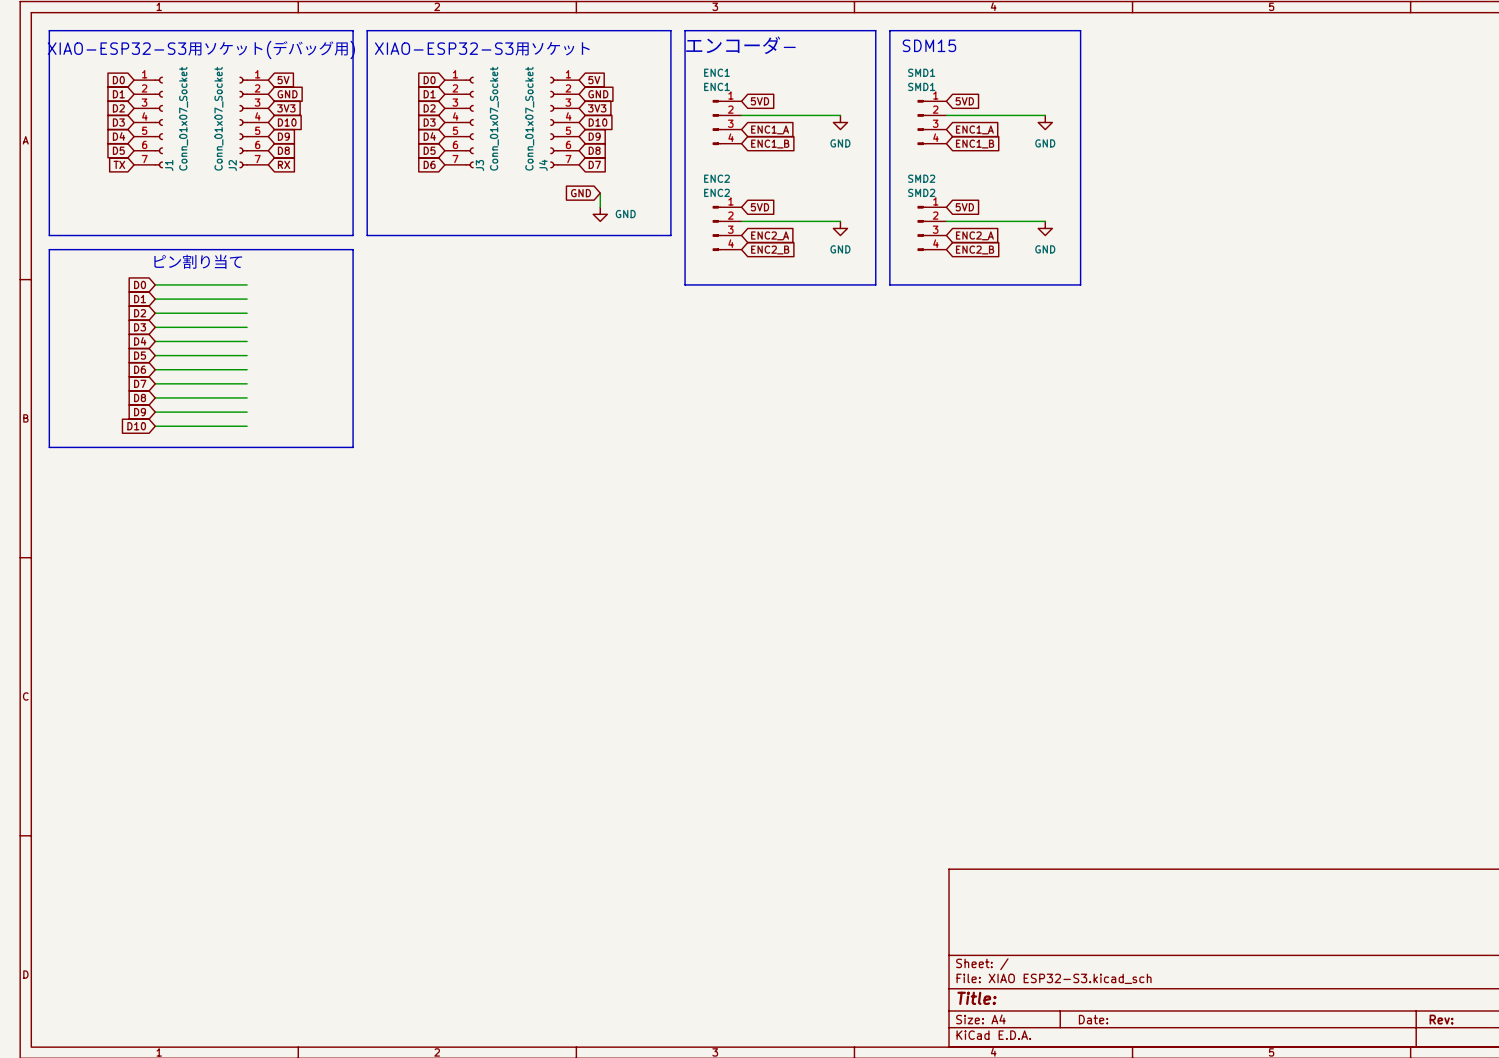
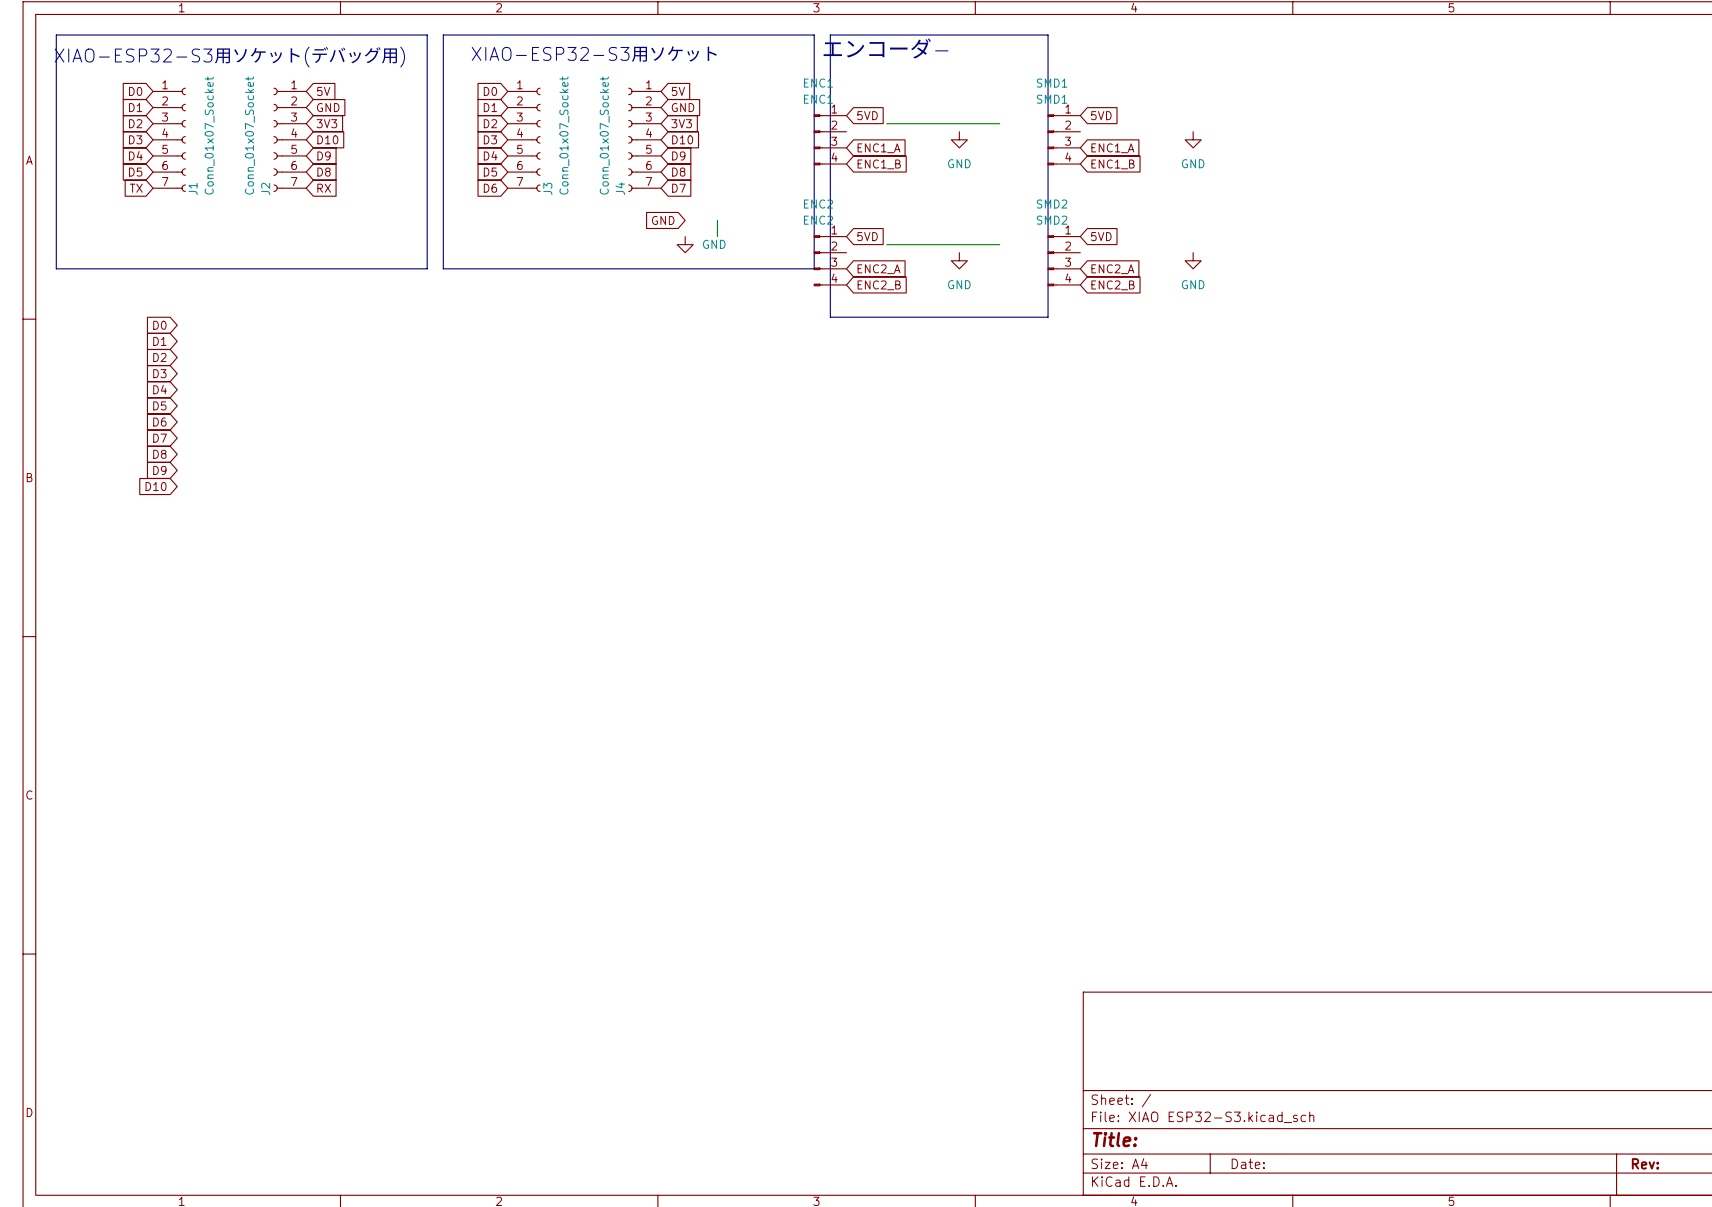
line: (353, 30) (353, 235) -> (403, 35) (419, 35)
line: (367, 30) (367, 235) -> (403, 268) (419, 268)
line: (374, 30) (388, 30) -> (427, 35) (427, 268)
line: (670, 30) (670, 235) -> (814, 35) (814, 268) (765, 268)
line: (685, 30) (685, 284) (875, 284) (875, 30) -> (781, 35) (765, 35)
line: (713, 30) (727, 30) -> (1048, 35) (1048, 317) (830, 317) (830, 35)
line: (889, 30) (889, 284) (1080, 284) (1080, 30) (918, 30) -> (1015, 35) (999, 35)
text position: エンコーダ- (740, 45) -> エンコーダ- (885, 48)
text: SDM15 (929, 45) -> none
text position: XIAO-ESP32-S3用ソケット (482, 48) -> XIAO-ESP32-S3用ソケット (594, 54)
wire: (741, 115) (840, 115) -> (886, 123) (999, 123)
wire: (946, 115) (1045, 115) -> none
wire: (600, 193) (600, 207) -> (717, 220) (717, 236)
wire: (741, 221) (840, 221) -> (886, 244) (999, 244)
wire: (946, 221) (1045, 221) -> none
line: (374, 235) (388, 235) -> (443, 35) (443, 268)
line: (49, 249) (49, 447) (353, 447) (353, 249) (49, 249) -> none
text: ピン割り当て (198, 261) -> none
wire: (155, 284) (247, 284) -> none
wire: (155, 299) (247, 299) -> none
wire: (155, 313) (247, 313) -> none
wire: (155, 327) (247, 327) -> none
wire: (155, 341) (247, 341) -> none
wire: (155, 355) (247, 355) -> none
wire: (155, 369) (247, 369) -> none
wire: (155, 383) (247, 383) -> none
wire: (155, 397) (247, 397) -> none
wire: (155, 412) (247, 412) -> none
wire: (155, 426) (247, 426) -> none

